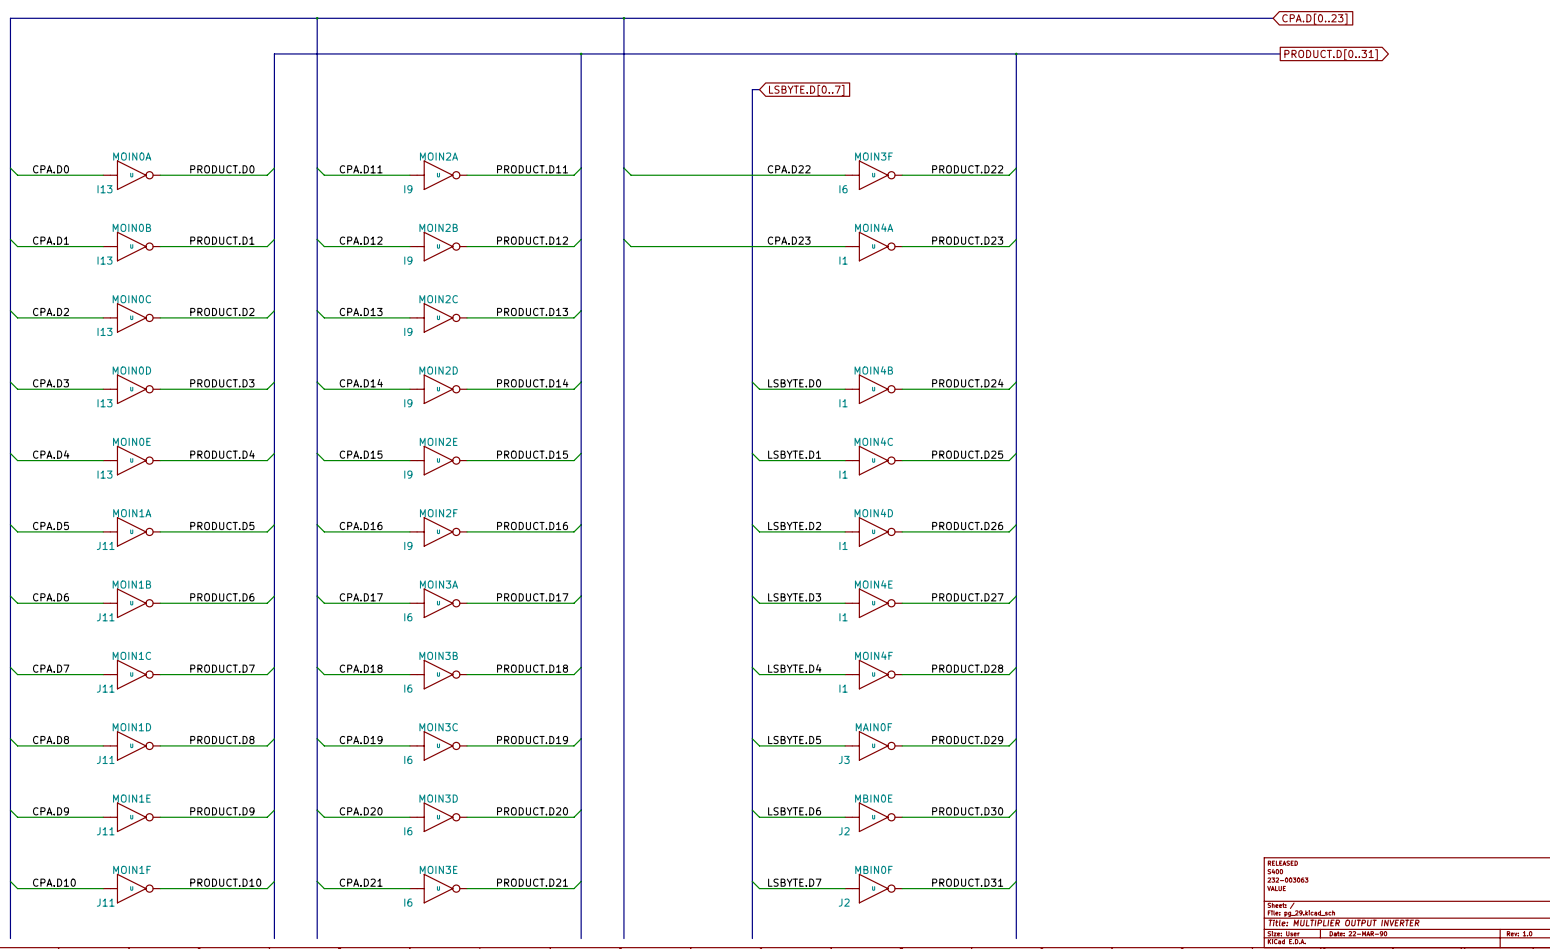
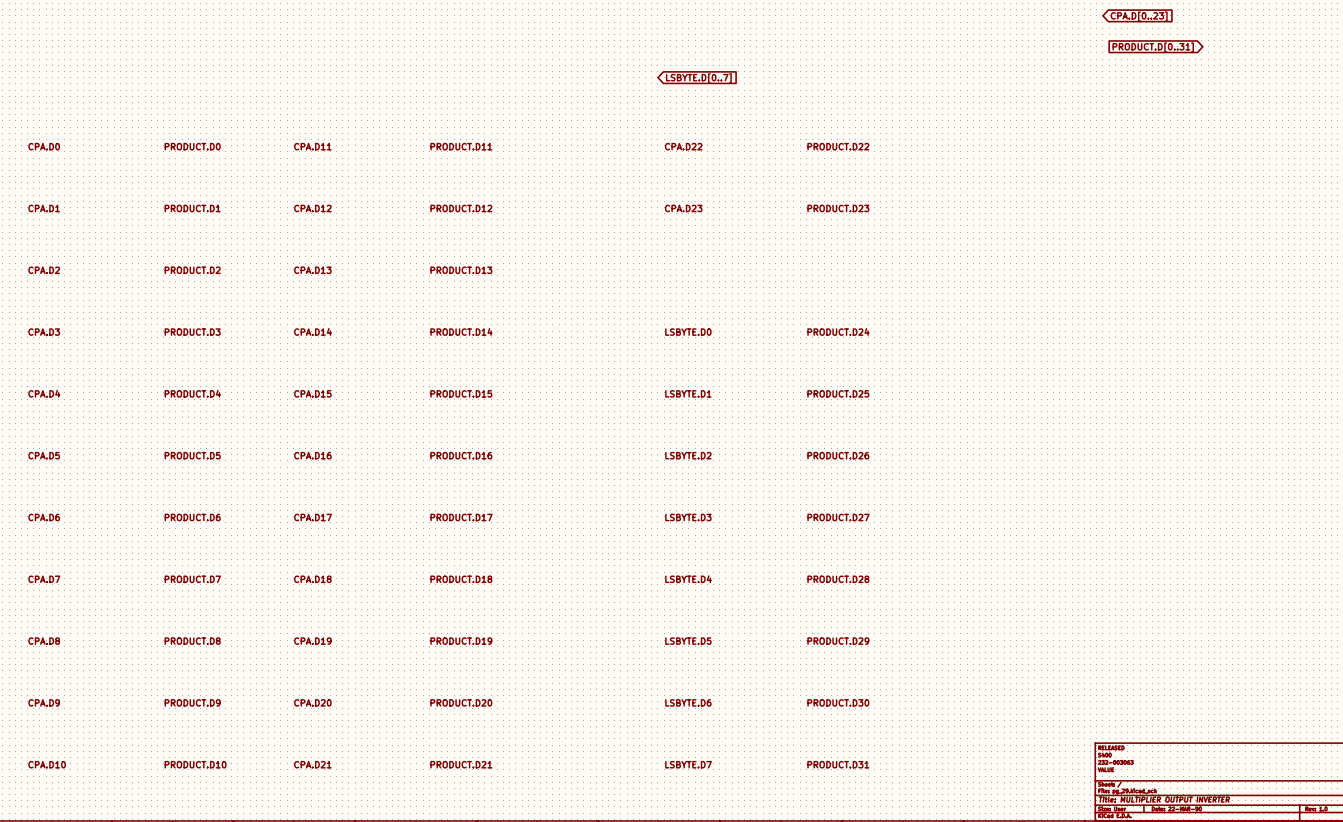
bus: (317, 18) (317, 938) -> none
junction: (317, 18) -> none
bus: (623, 18) (623, 938) -> none
junction: (623, 18) -> none
bus: (1273, 18) (10, 18) (10, 938) -> none
bus: (581, 53) (581, 938) -> none
junction: (581, 53) -> none
bus: (1016, 53) (1016, 938) -> none
junction: (1016, 53) -> none
bus: (1280, 53) (274, 53) (274, 938) -> none
bus: (759, 89) (752, 89) (752, 938) -> none
wire: (10, 168) (17, 175) (103, 175) -> none
wire: (274, 168) (267, 175) (160, 175) -> none
wire: (317, 168) (324, 175) (409, 175) -> none
wire: (581, 168) (574, 175) (467, 175) -> none
wire: (623, 168) (631, 175) (845, 175) -> none
wire: (1016, 168) (1009, 175) (902, 175) -> none
part: (131, 175) -> none
part: (438, 175) -> none
part: (873, 175) -> none
wire: (10, 239) (17, 246) (103, 246) -> none
wire: (274, 239) (267, 246) (160, 246) -> none
wire: (317, 239) (324, 246) (409, 246) -> none
wire: (581, 239) (574, 246) (467, 246) -> none
wire: (623, 239) (631, 246) (845, 246) -> none
wire: (1016, 239) (1009, 246) (902, 246) -> none
part: (131, 246) -> none
part: (438, 246) -> none
part: (873, 246) -> none
wire: (10, 310) (17, 317) (103, 317) -> none
wire: (274, 310) (267, 317) (160, 317) -> none
wire: (317, 310) (324, 317) (409, 317) -> none
wire: (581, 310) (574, 317) (467, 317) -> none
part: (131, 317) -> none
part: (438, 317) -> none
wire: (10, 382) (17, 389) (103, 389) -> none
wire: (274, 382) (267, 389) (160, 389) -> none
wire: (317, 382) (324, 389) (409, 389) -> none
wire: (581, 382) (574, 389) (467, 389) -> none
wire: (752, 382) (759, 389) (845, 389) -> none
wire: (1016, 382) (1009, 389) (902, 389) -> none
part: (131, 389) -> none
part: (438, 389) -> none
part: (873, 389) -> none
wire: (10, 453) (17, 460) (103, 460) -> none
wire: (274, 453) (267, 460) (160, 460) -> none
wire: (317, 453) (324, 460) (409, 460) -> none
wire: (581, 453) (574, 460) (467, 460) -> none
wire: (752, 453) (759, 460) (845, 460) -> none
wire: (1016, 453) (1009, 460) (902, 460) -> none
part: (131, 460) -> none
part: (438, 460) -> none
part: (873, 460) -> none
wire: (10, 524) (17, 531) (103, 531) -> none
wire: (274, 524) (267, 531) (160, 531) -> none
wire: (317, 524) (324, 531) (409, 531) -> none
wire: (581, 524) (574, 531) (467, 531) -> none
wire: (752, 524) (759, 531) (845, 531) -> none
wire: (1016, 524) (1009, 531) (902, 531) -> none
part: (131, 531) -> none
part: (438, 531) -> none
part: (873, 531) -> none
wire: (10, 596) (17, 603) (103, 603) -> none
wire: (274, 596) (267, 603) (160, 603) -> none
wire: (317, 596) (324, 603) (409, 603) -> none
wire: (581, 596) (574, 603) (467, 603) -> none
wire: (752, 596) (759, 603) (845, 603) -> none
wire: (1016, 596) (1009, 603) (902, 603) -> none
part: (131, 603) -> none
part: (438, 603) -> none
part: (873, 603) -> none
wire: (10, 667) (17, 674) (103, 674) -> none
wire: (274, 667) (267, 674) (160, 674) -> none
wire: (317, 667) (324, 674) (409, 674) -> none
wire: (581, 667) (574, 674) (467, 674) -> none
wire: (752, 667) (759, 674) (845, 674) -> none
wire: (1016, 667) (1009, 674) (902, 674) -> none
part: (131, 674) -> none
part: (438, 674) -> none
part: (873, 674) -> none
wire: (10, 738) (17, 745) (103, 745) -> none
wire: (274, 738) (267, 745) (160, 745) -> none
wire: (317, 738) (324, 745) (409, 745) -> none
wire: (581, 738) (574, 745) (467, 745) -> none
wire: (752, 738) (759, 745) (845, 745) -> none
wire: (1016, 738) (1009, 745) (902, 745) -> none
part: (131, 745) -> none
part: (438, 745) -> none
part: (873, 745) -> none
wire: (10, 810) (17, 817) (103, 817) -> none
wire: (274, 810) (267, 817) (160, 817) -> none
wire: (317, 810) (324, 817) (409, 817) -> none
wire: (581, 810) (574, 817) (467, 817) -> none
wire: (752, 810) (759, 817) (845, 817) -> none
wire: (1016, 810) (1009, 817) (902, 817) -> none
part: (131, 817) -> none
part: (438, 817) -> none
part: (873, 817) -> none
wire: (10, 881) (17, 888) (103, 888) -> none
wire: (274, 881) (267, 888) (160, 888) -> none
wire: (317, 881) (324, 888) (409, 888) -> none
wire: (581, 881) (574, 888) (467, 888) -> none
wire: (752, 881) (759, 888) (845, 888) -> none
wire: (1016, 881) (1009, 888) (902, 888) -> none
part: (131, 888) -> none
part: (438, 888) -> none
part: (873, 888) -> none

